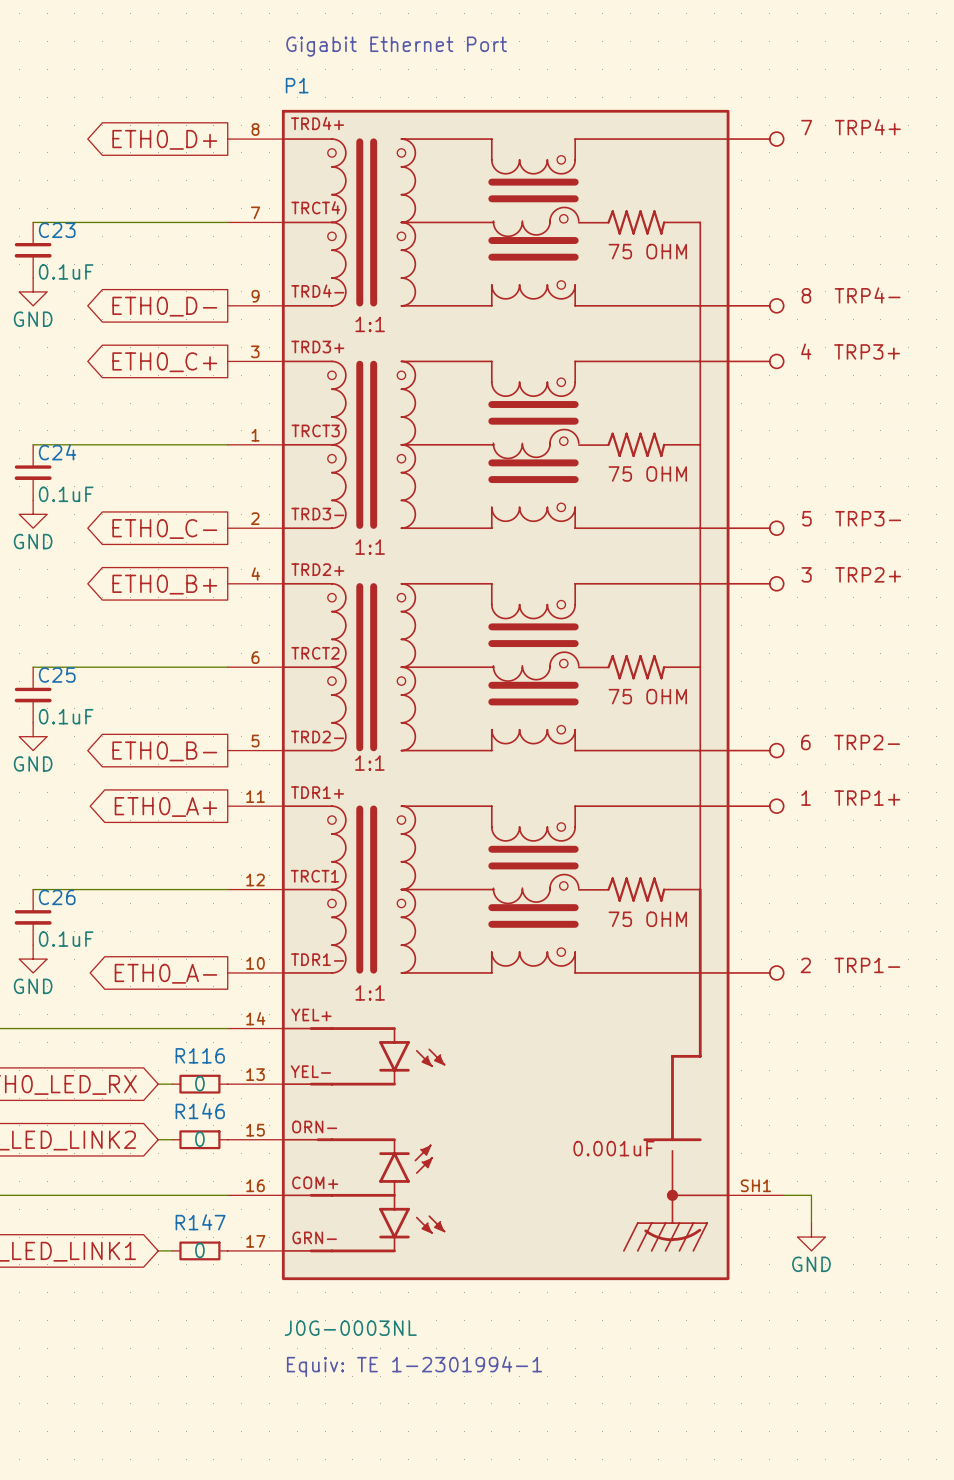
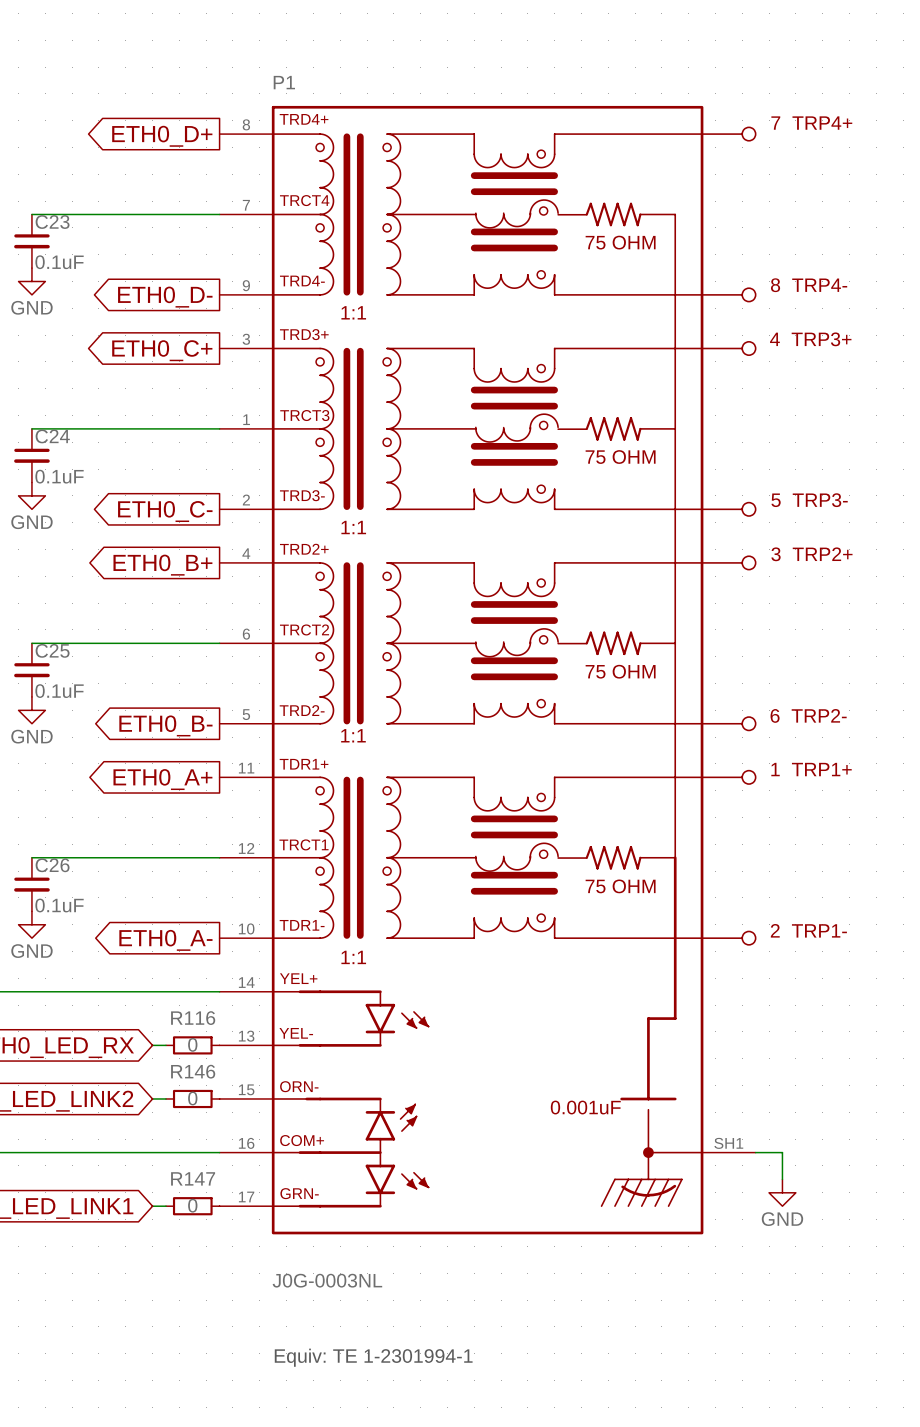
text: Gigabit Ethernet Port (396, 46) -> none
text position: Equiv: TE 1-2301994-1 (414, 1366) -> Equiv: TE 1-2301994-1 (373, 1357)

